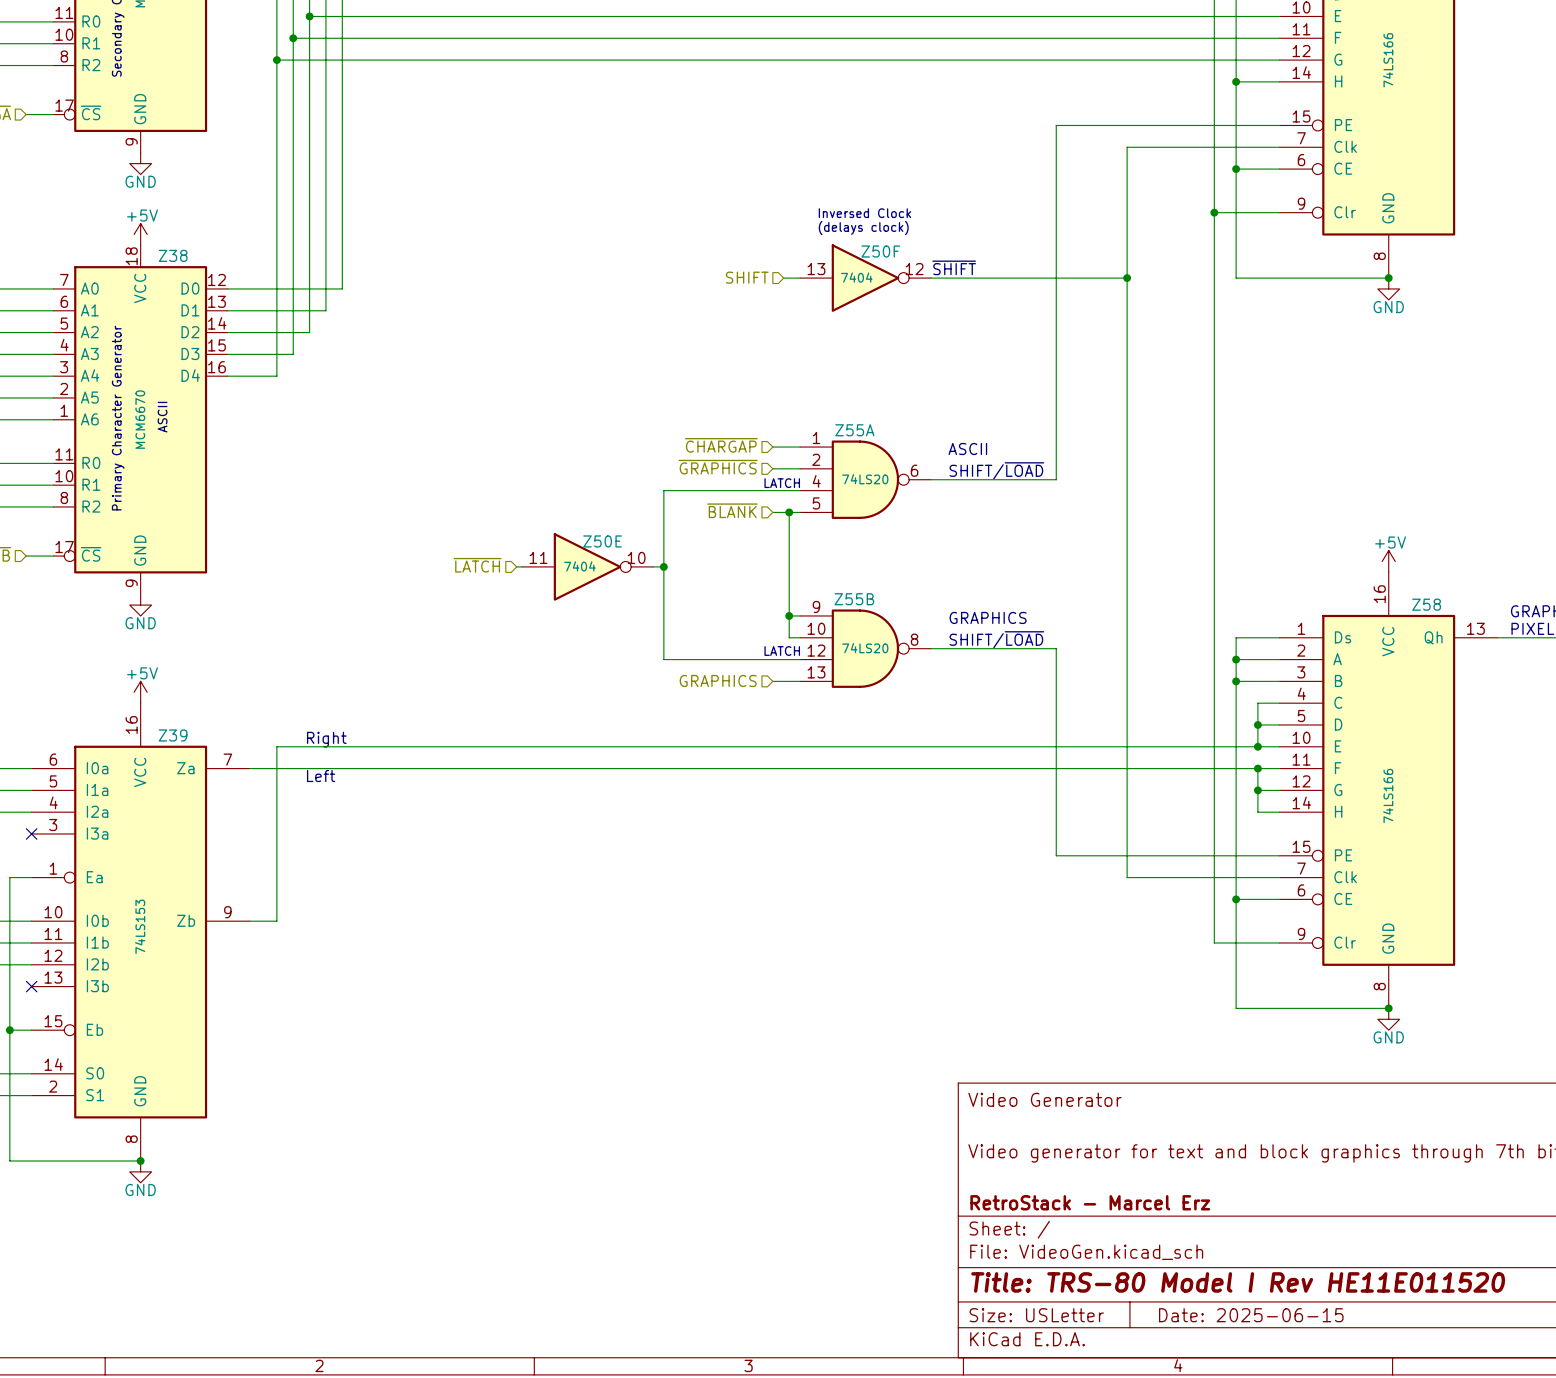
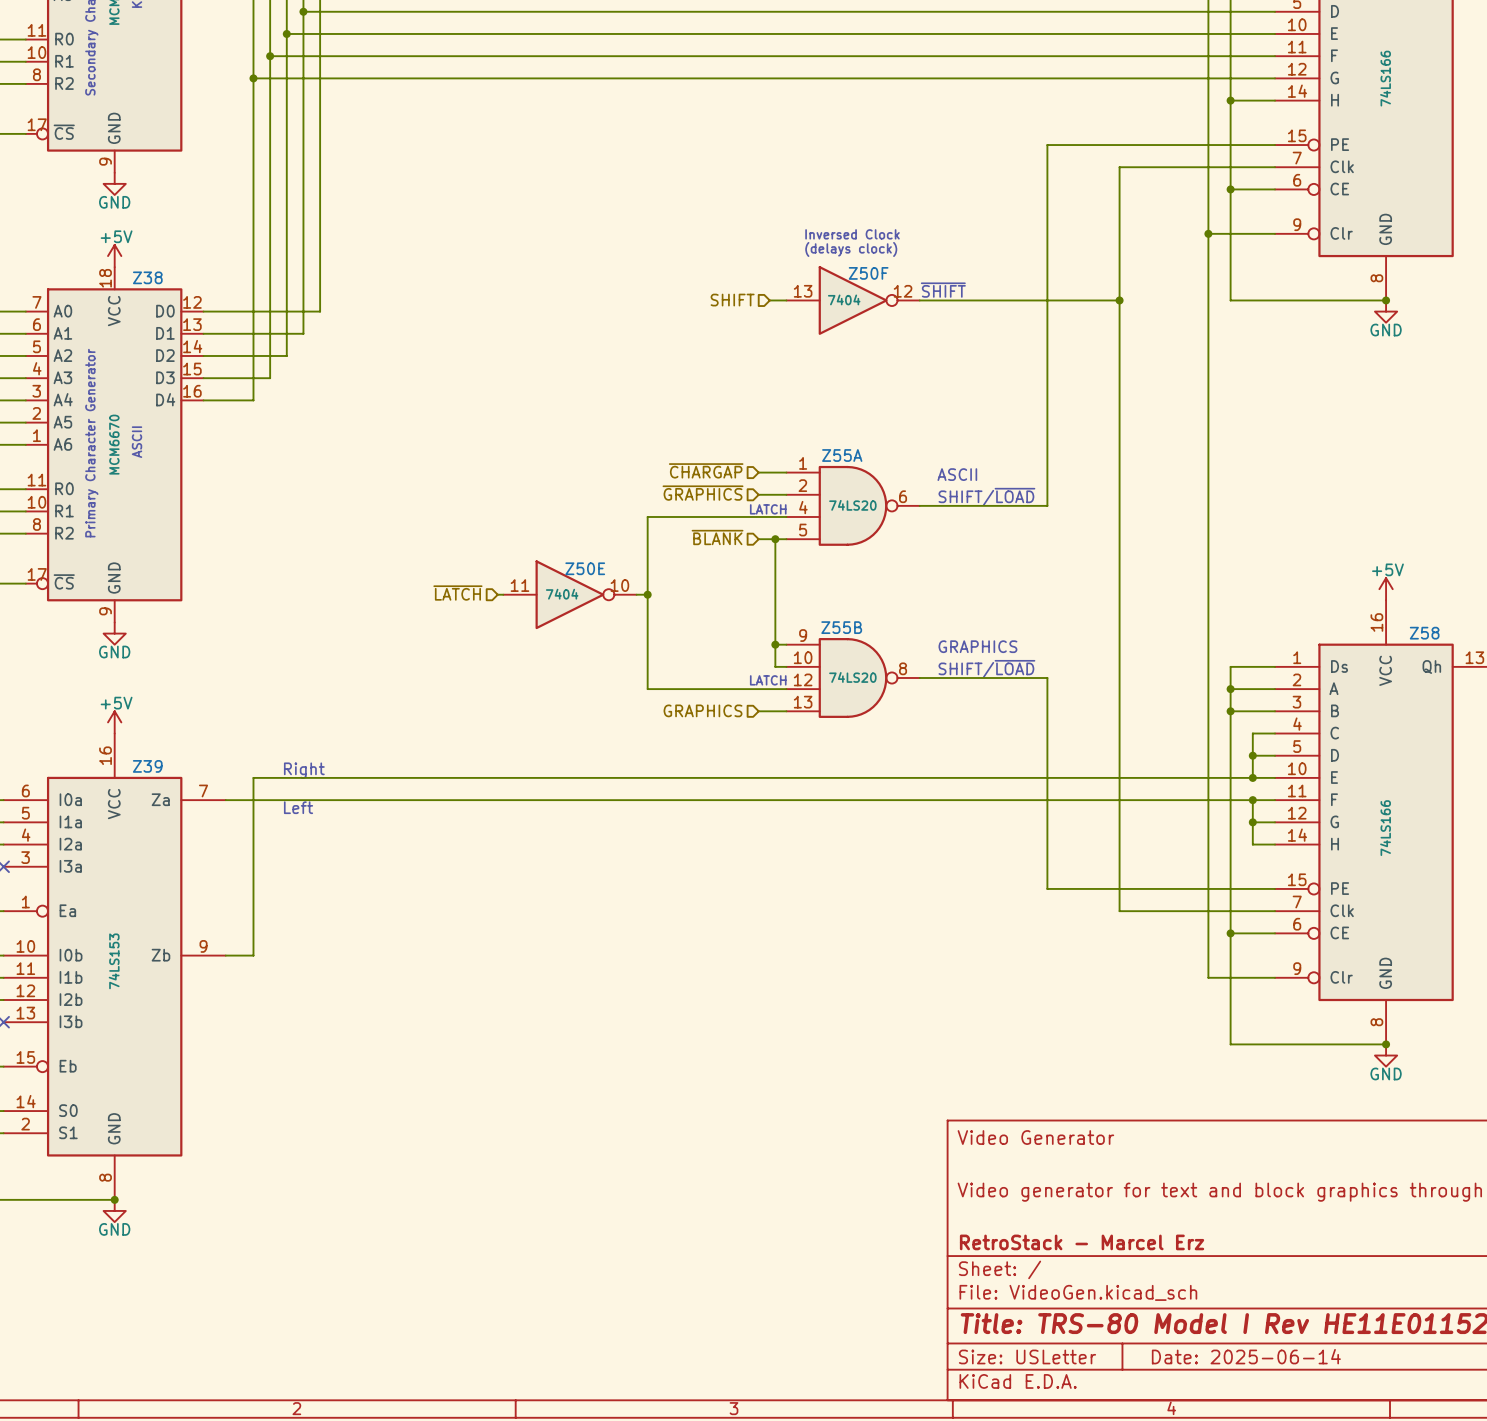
title block: Date: 2025-06-15 (1251, 1315) -> Date: 2025-06-14 (1246, 1356)

